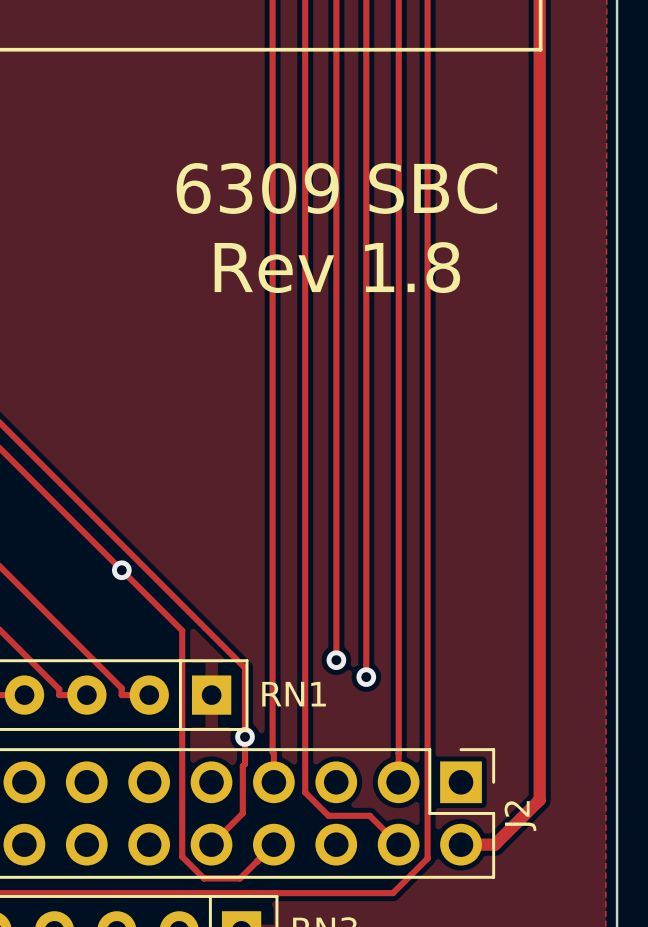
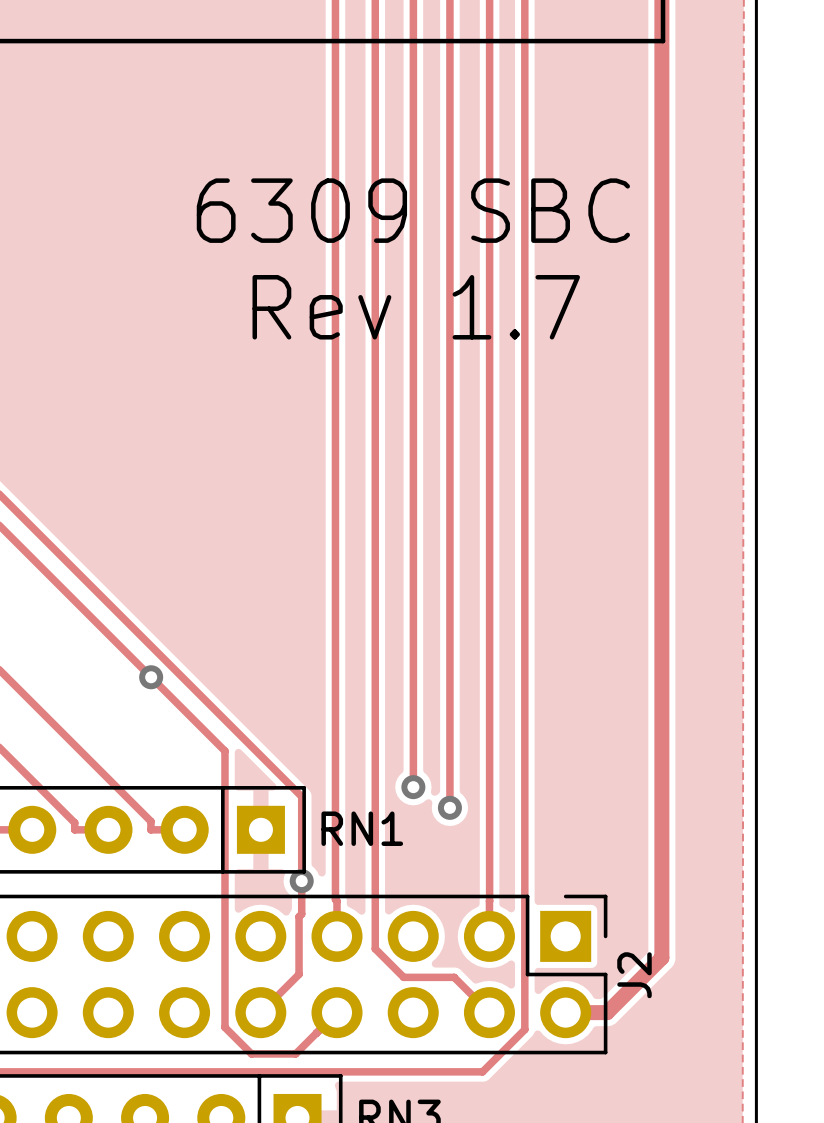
text: Rev 1.8 (337, 267) -> Rev 1.7 (416, 307)

